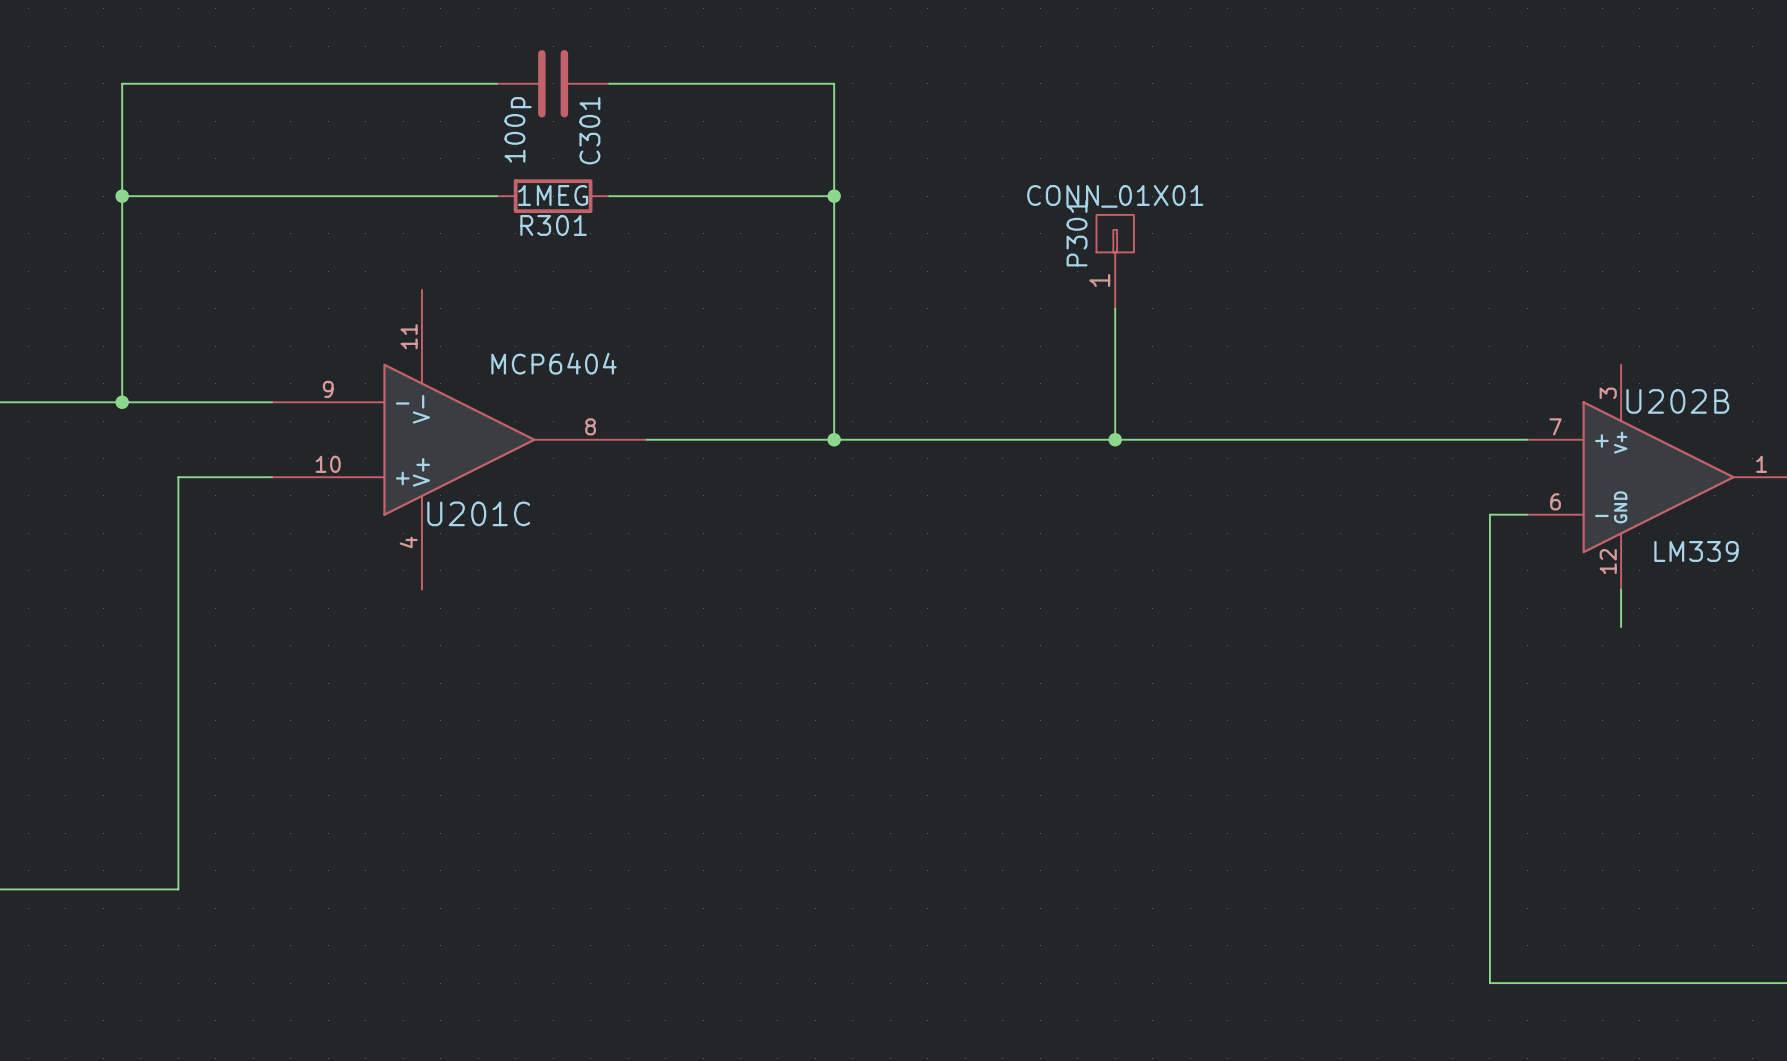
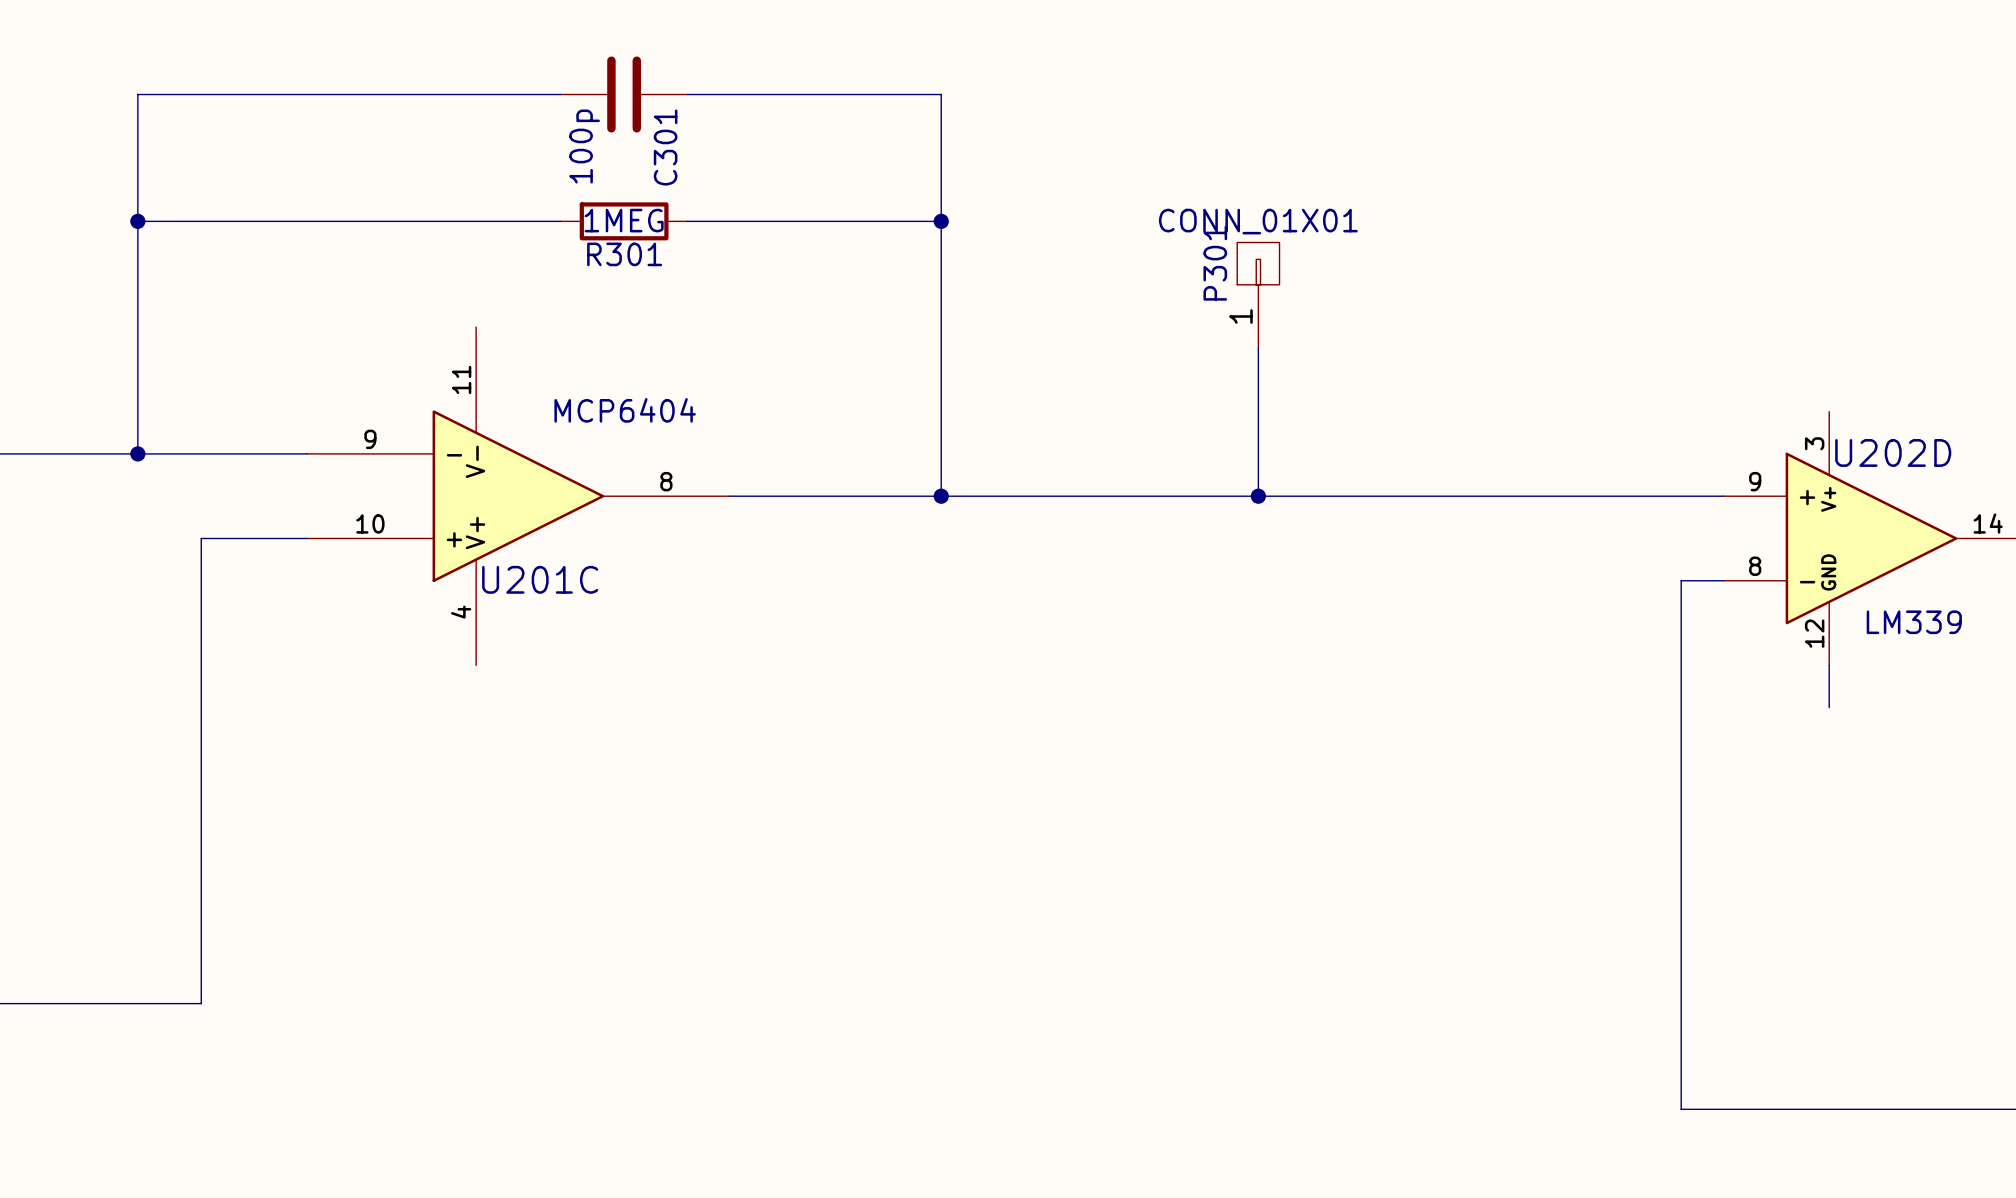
U202B name: U202B (1677, 401) -> U202D (1893, 452)
U202B pin number: 7 (1555, 426) -> 9 (1755, 481)
U202B pin number: 1 (1761, 464) -> 14 (1988, 523)
U202B pin number: 6 (1555, 501) -> 8 (1755, 566)

